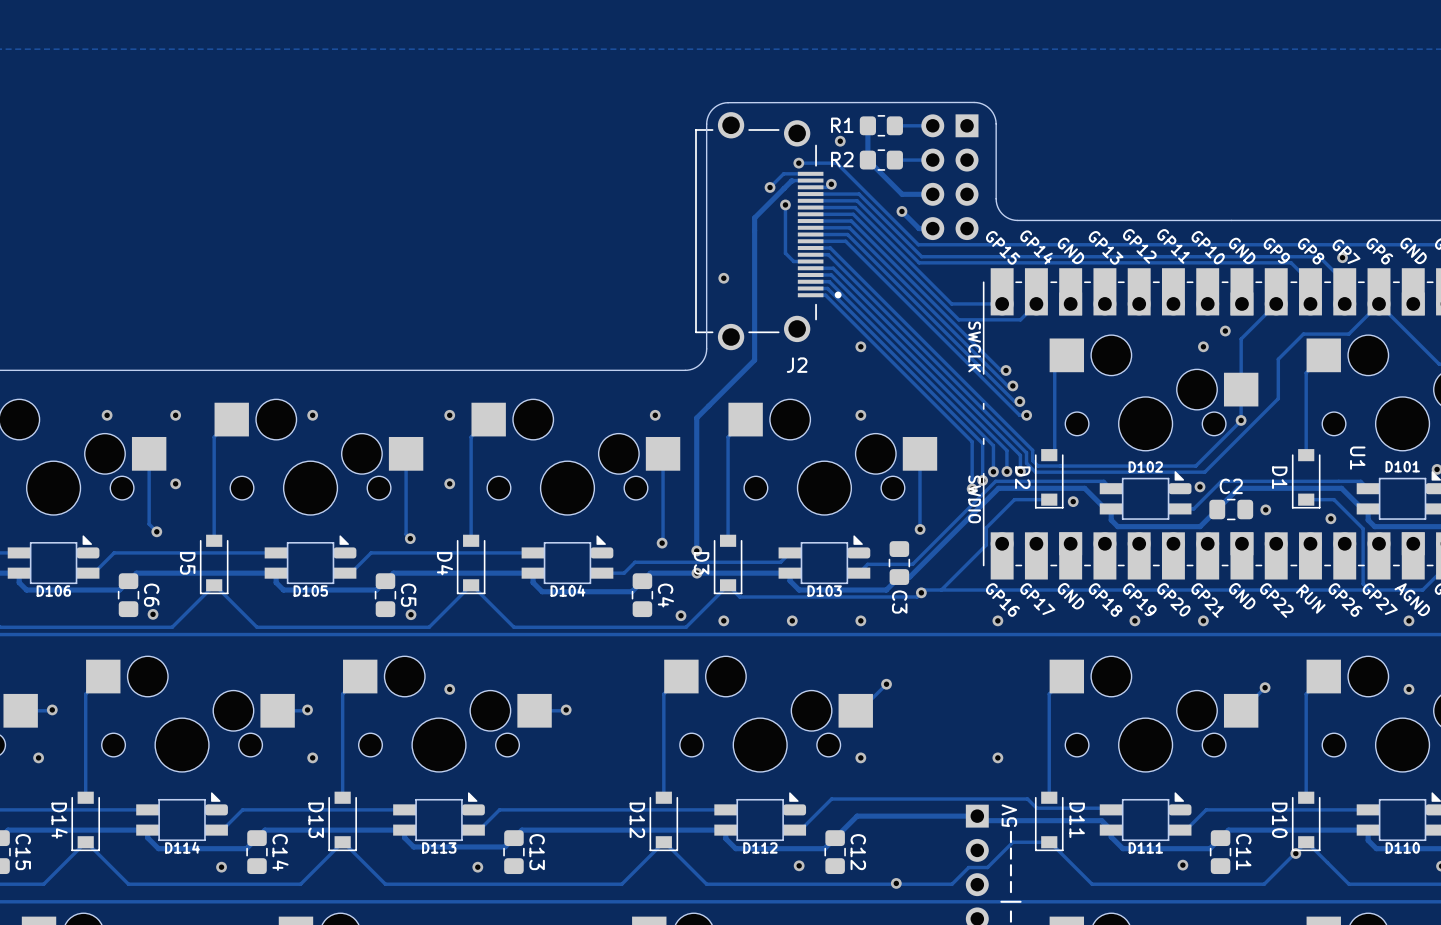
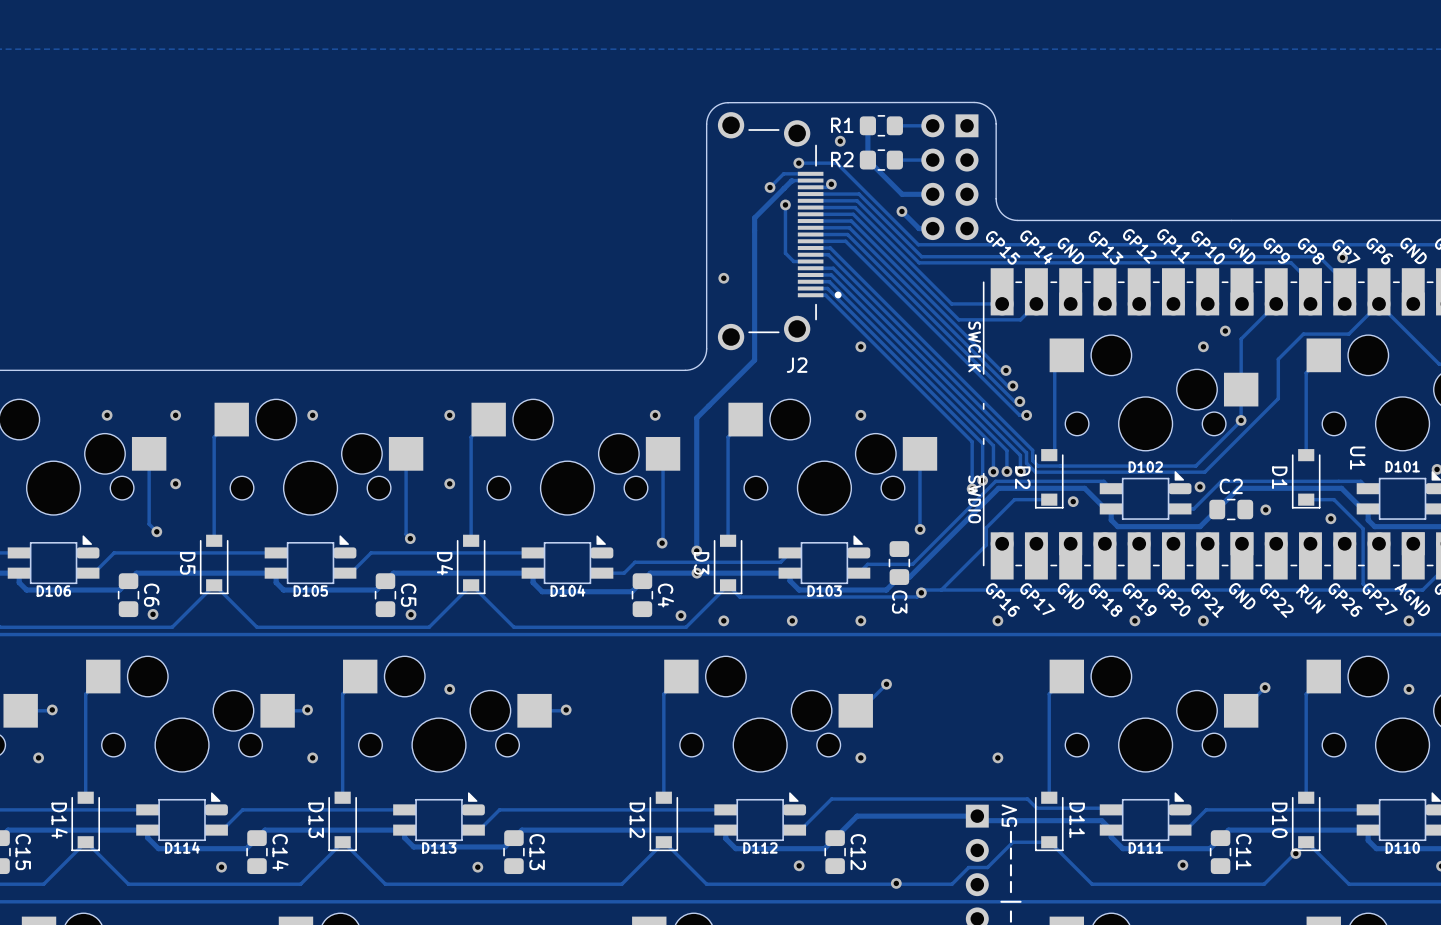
J2 footprint: [695, 112, 842, 351] -> [717, 112, 842, 351]

